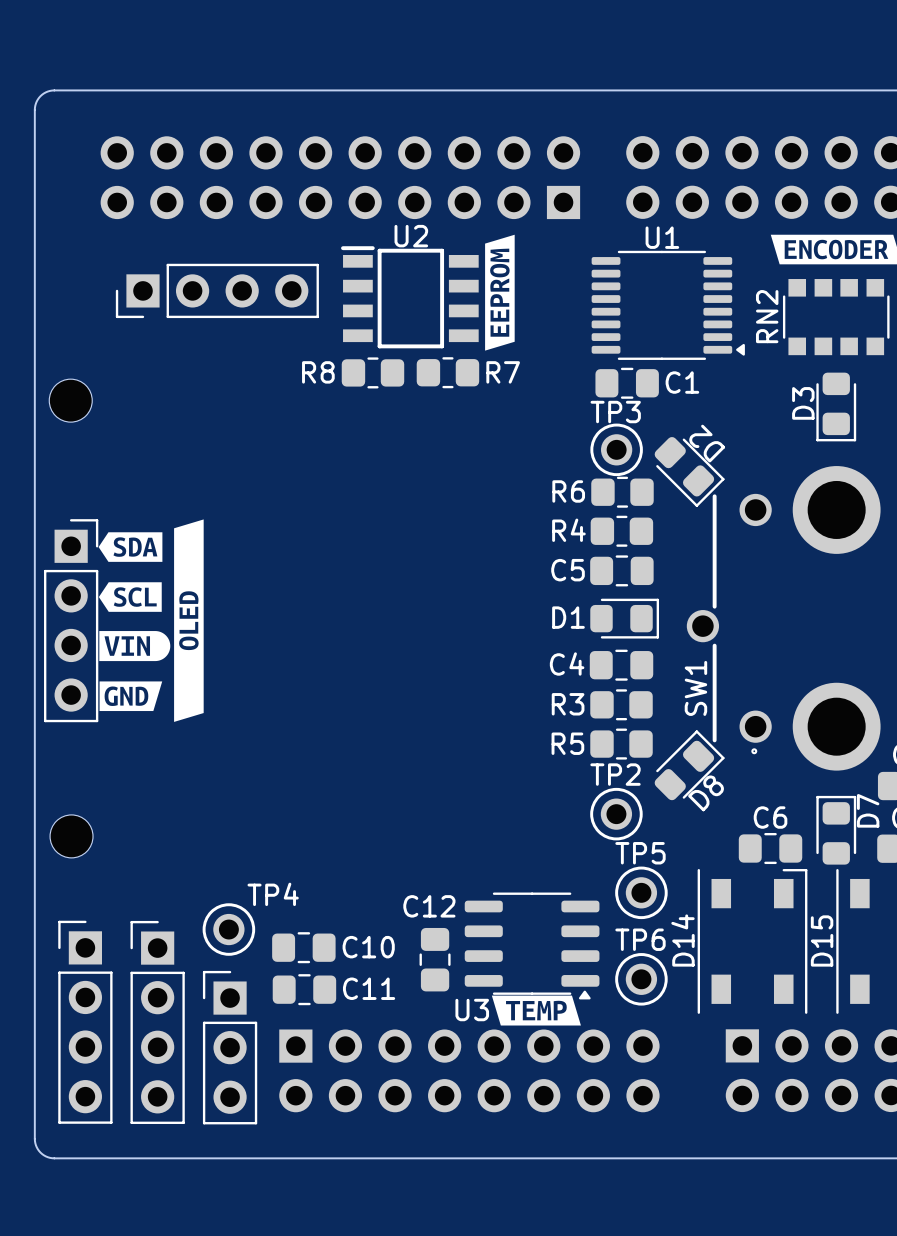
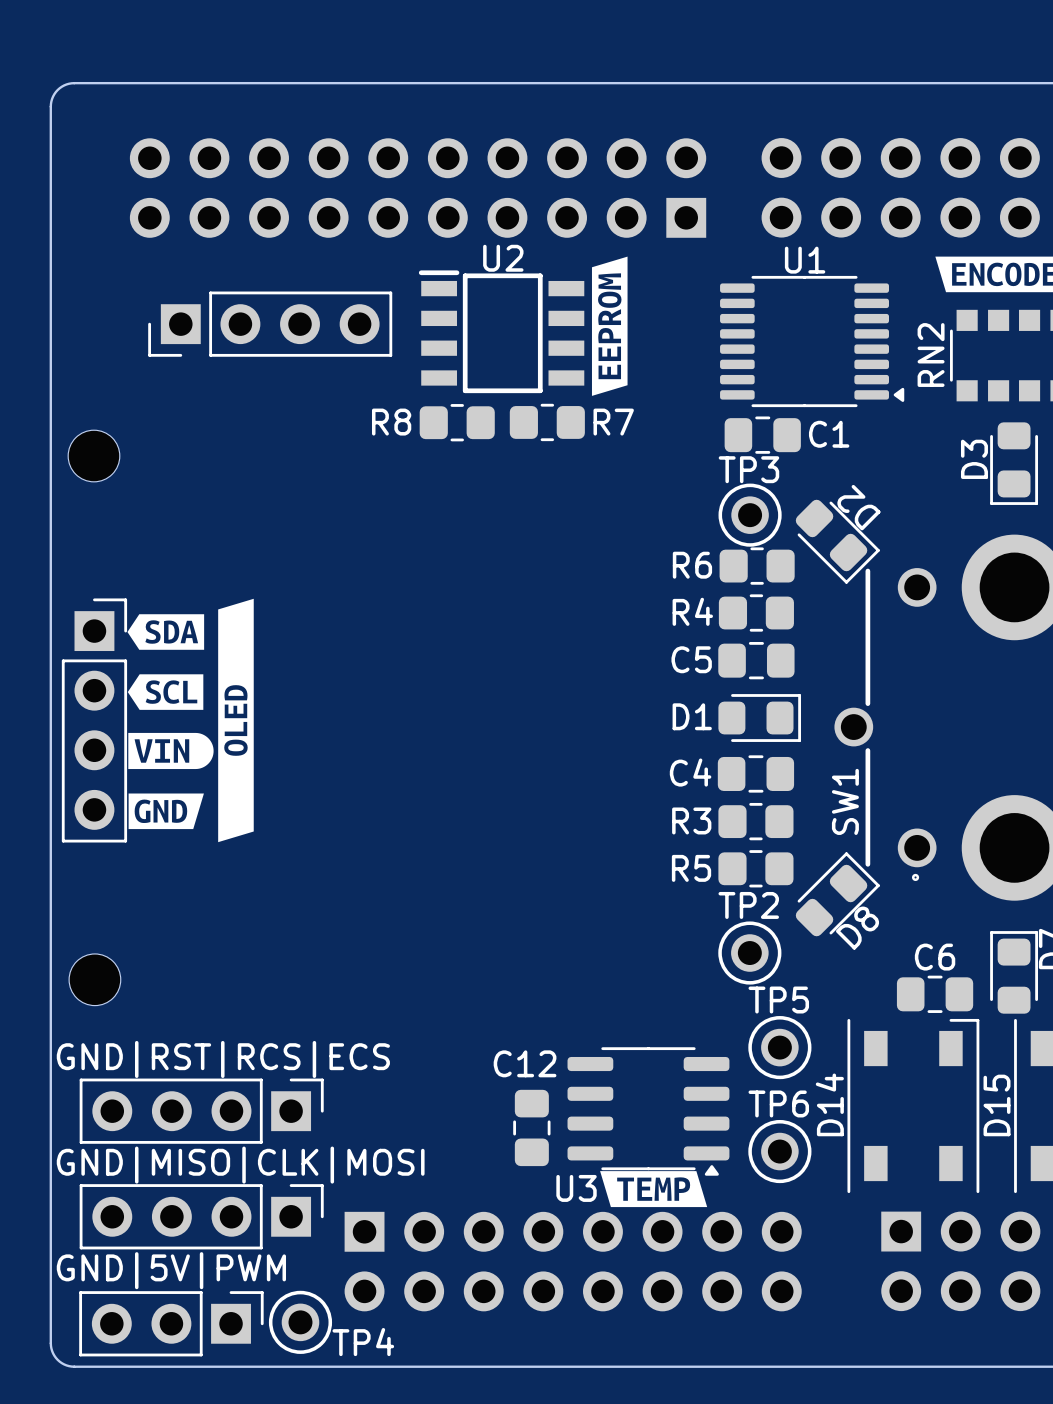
TP4 name position: TP4 (273, 894) -> TP4 (363, 1342)
text: none -> GND|RST|RCS|ECS (223, 1059)
TP4 position: (228, 929) -> (300, 1322)
C10: (303, 947) -> none
C11: (304, 989) -> none
text: none -> GND|MISO|CLK|MOSI (240, 1165)
part rotation: 0° (85, 1022) -> 90° clockwise (201, 1111)
part rotation: 0° (157, 1022) -> 90° clockwise (201, 1216)
part rotation: 0° (230, 1047) -> 90° clockwise (171, 1323)
part position: (230, 1047) -> (171, 1323)
text: none -> GND|5V|PWM (171, 1270)

